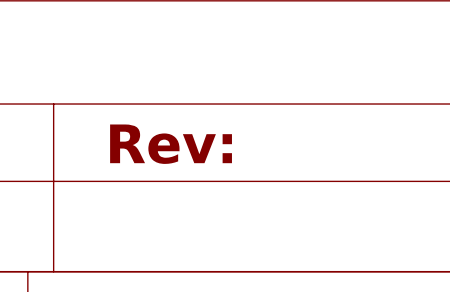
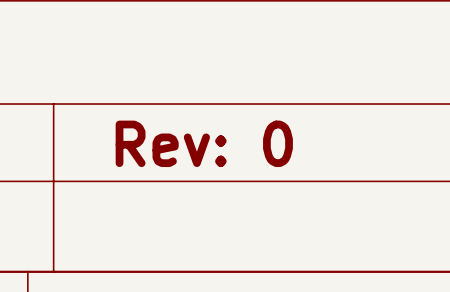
title block: Rev: (171, 144) -> Rev: 0 (204, 143)

